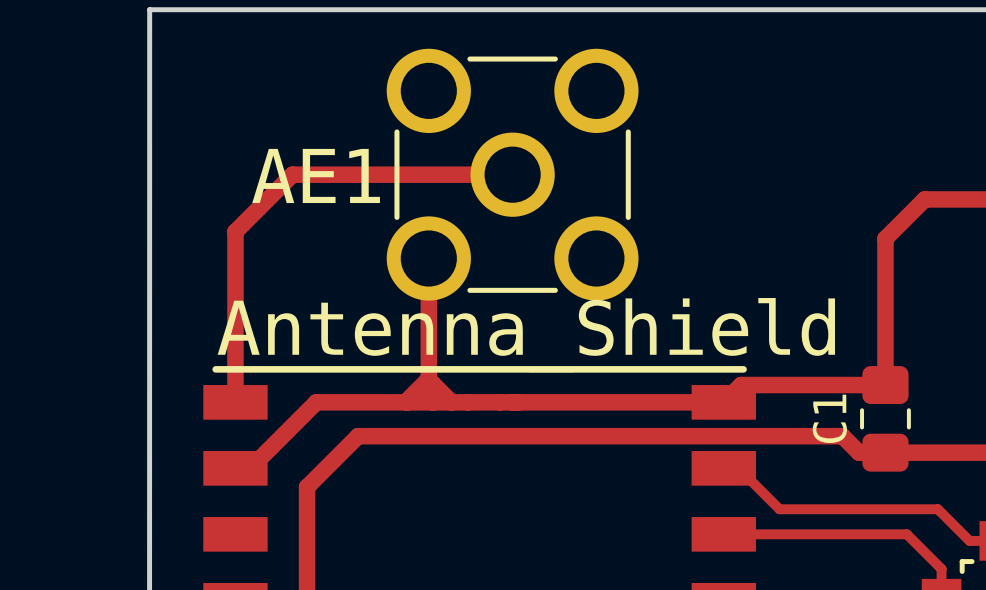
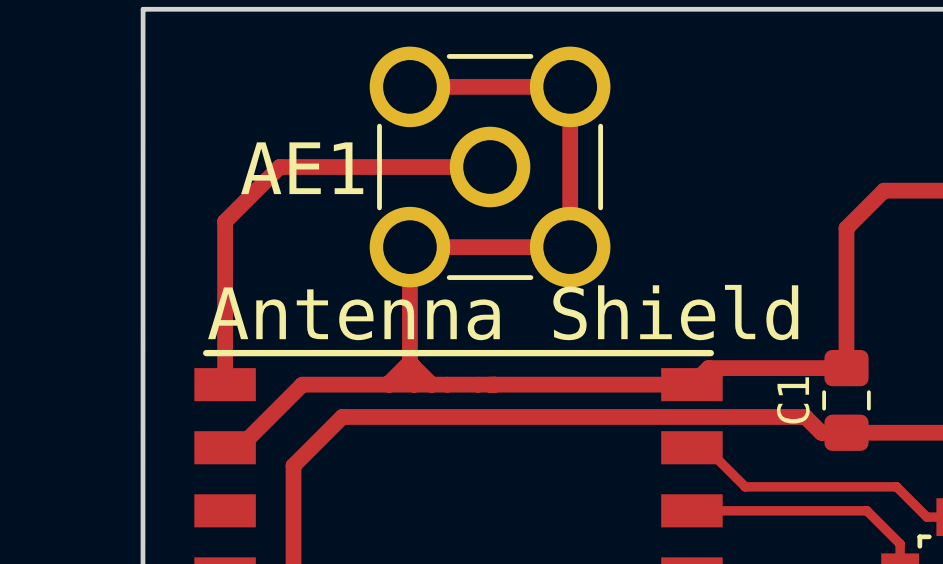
top track: none -> (409, 86) (570, 86) (570, 247) (409, 247)

